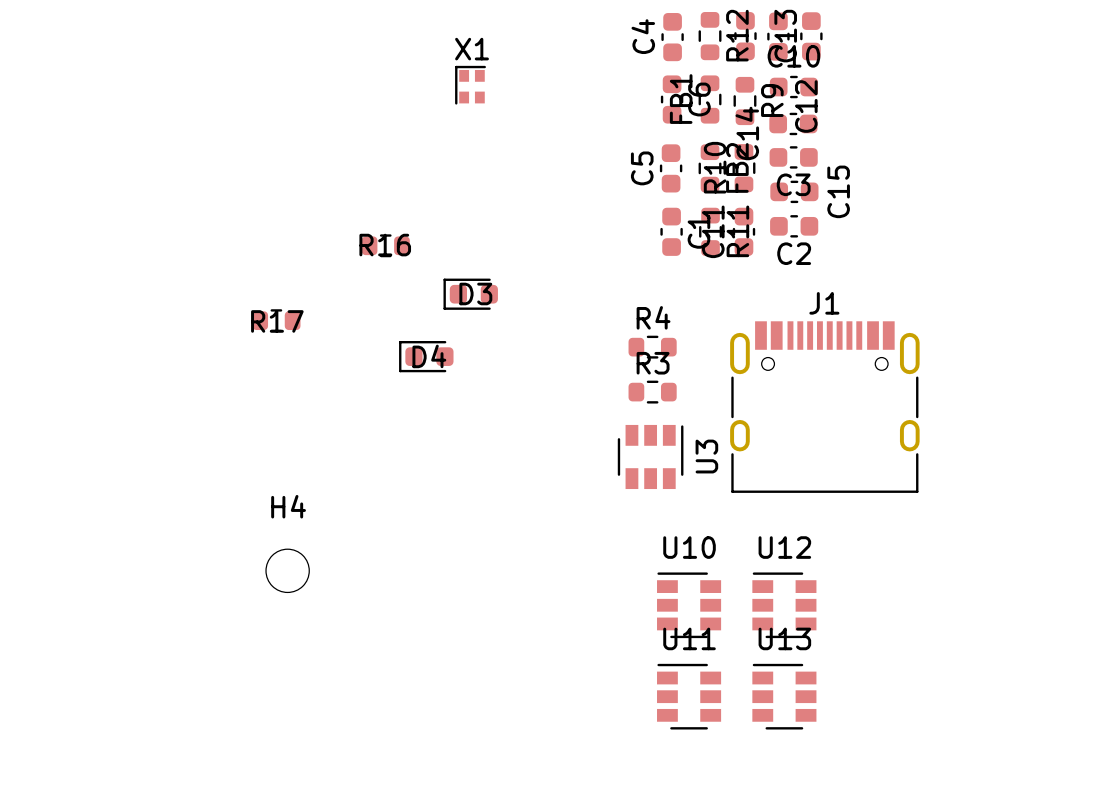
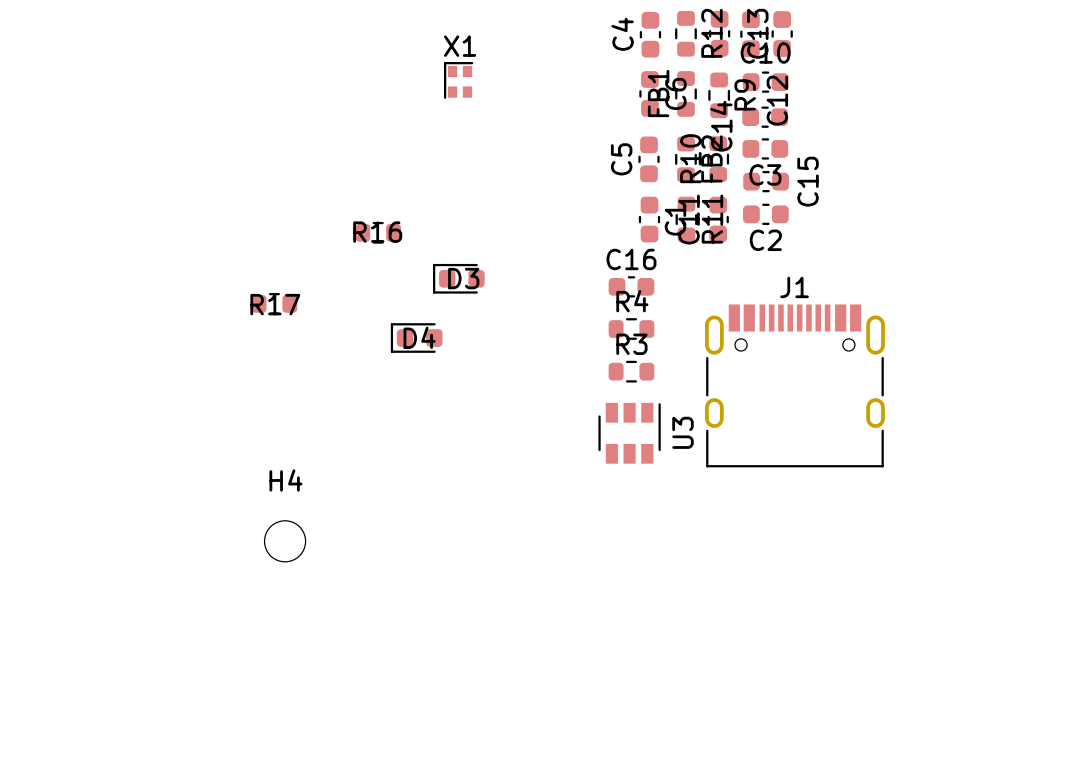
C16: none -> (631, 286)
U10: (689, 605) -> none
U12: (784, 605) -> none
U11: (689, 696) -> none
U13: (784, 696) -> none

